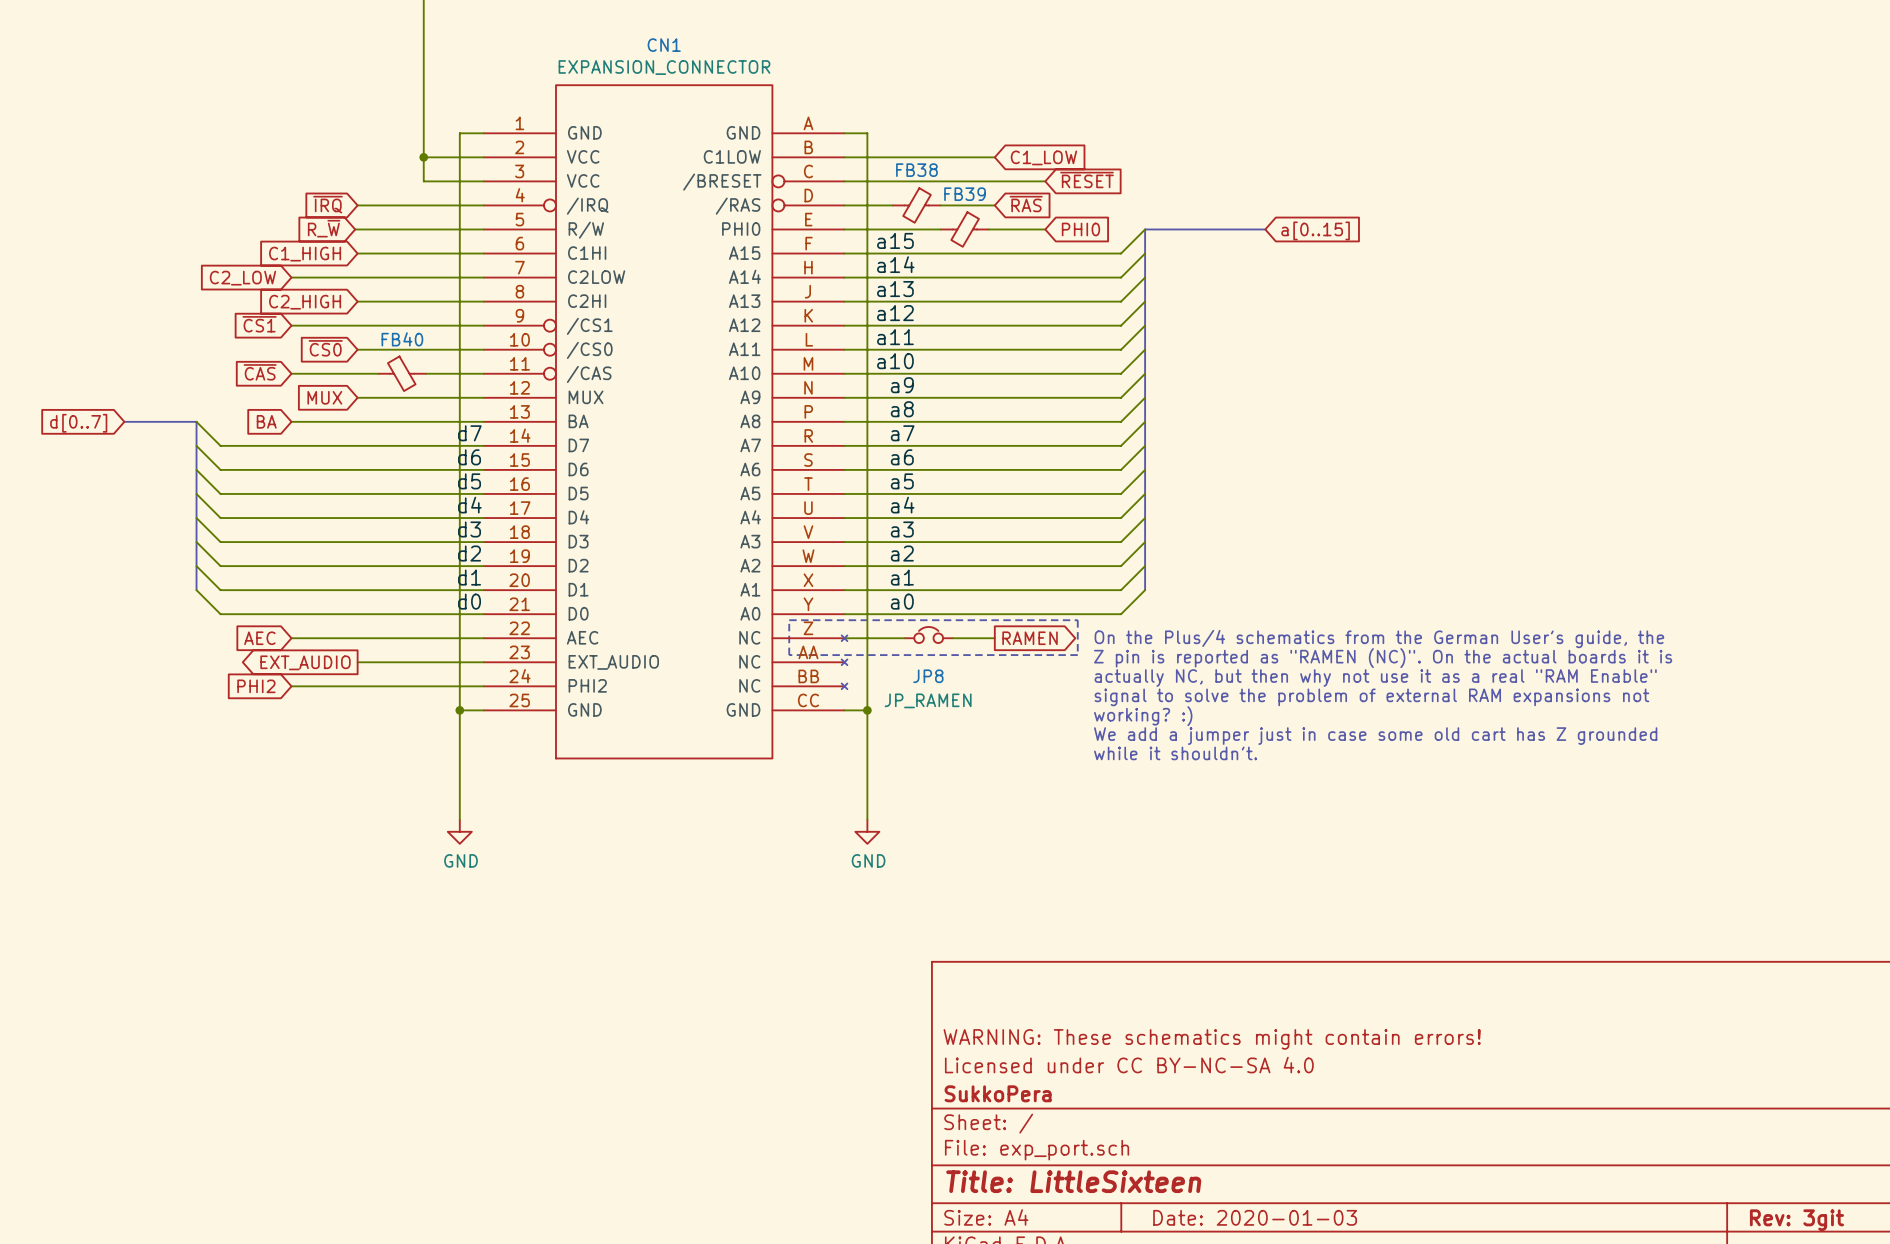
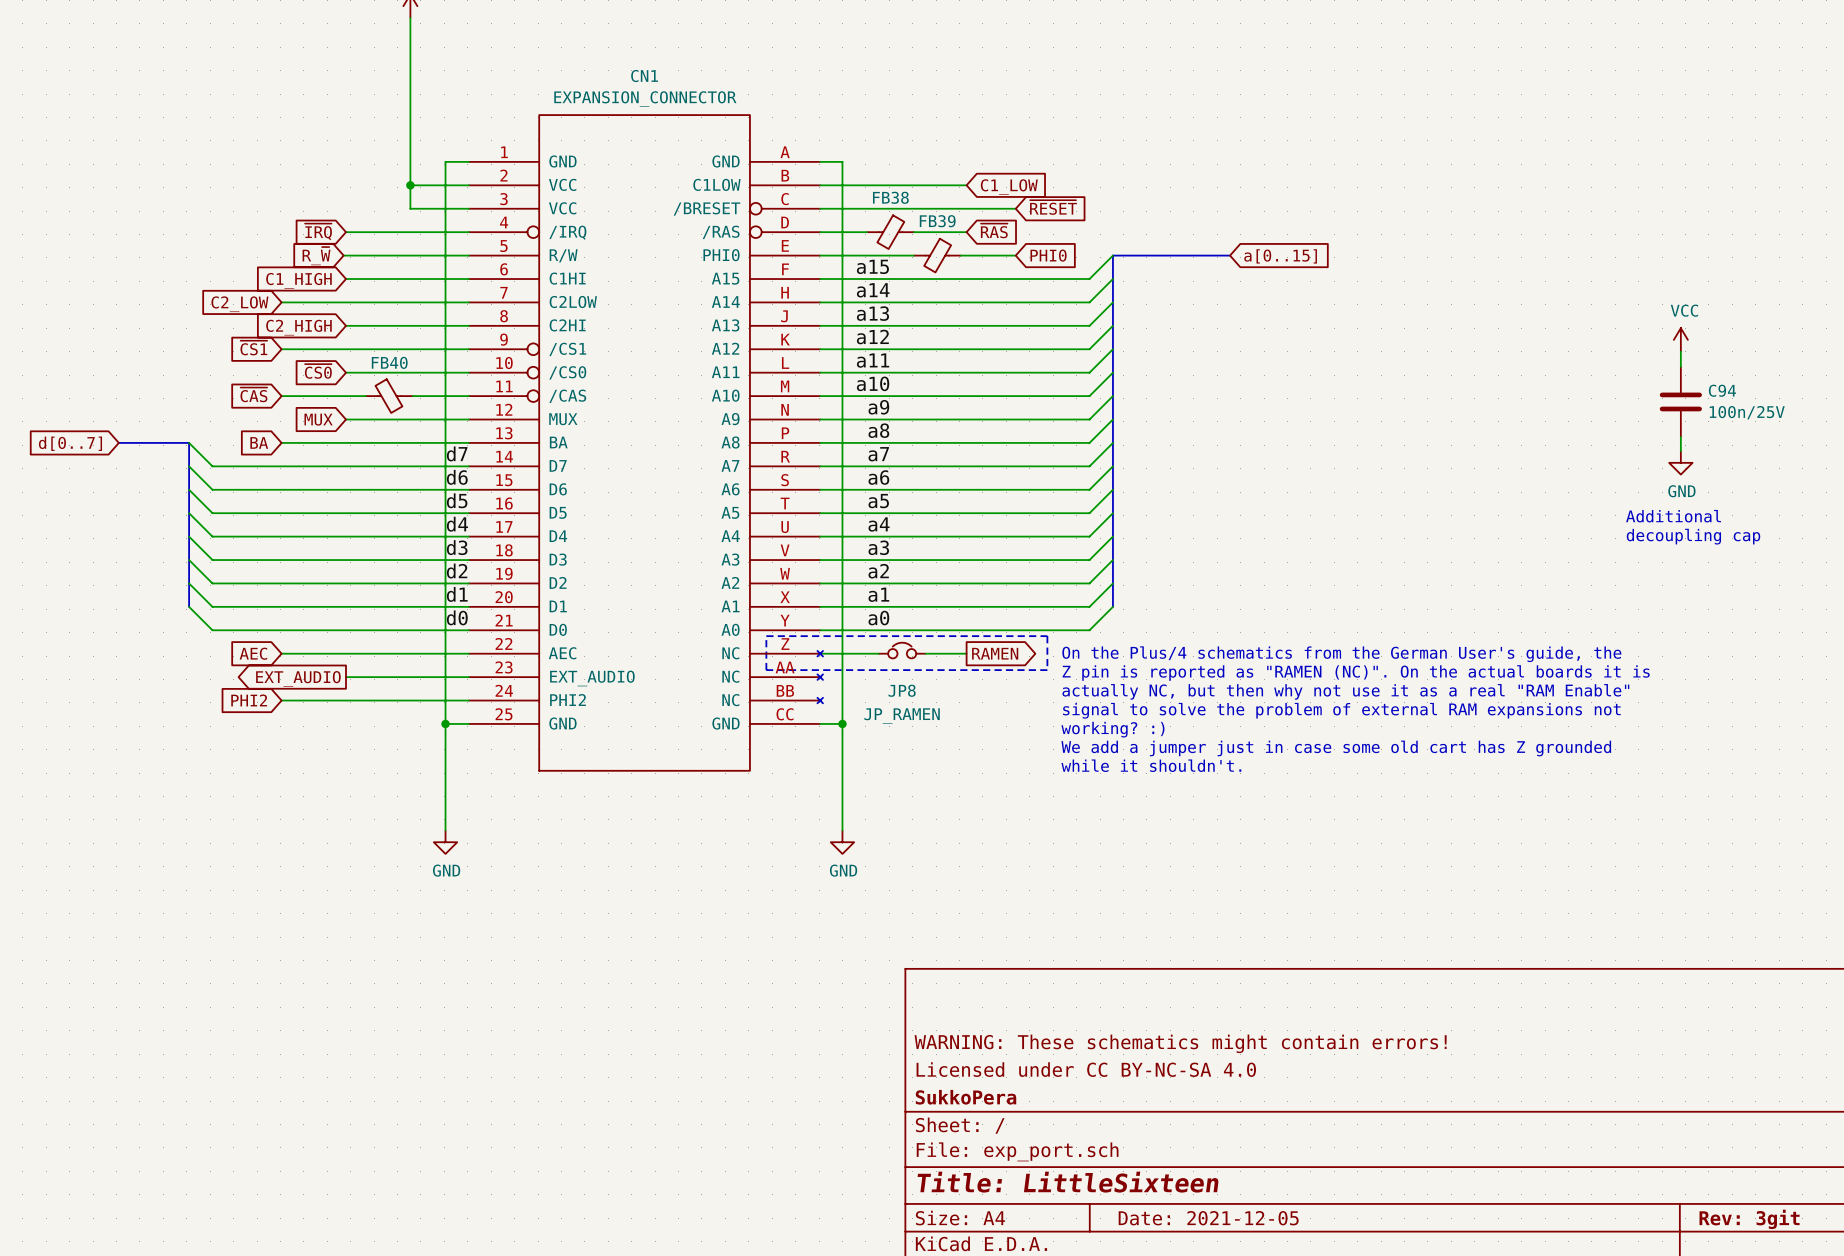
power symbol: none -> VCC (1680, 339)
wire: none -> (1680, 351) (1680, 366)
C94: none -> 100n/25V (1680, 401)
wire: none -> (1680, 437) (1680, 451)
power symbol: none -> GND (1680, 462)
text: none -> Additional (1673, 516)
text: none -> decoupling cap (1693, 536)
title block: Date: 2020-01-03 (1255, 1217) -> Date: 2021-12-05 (1208, 1218)

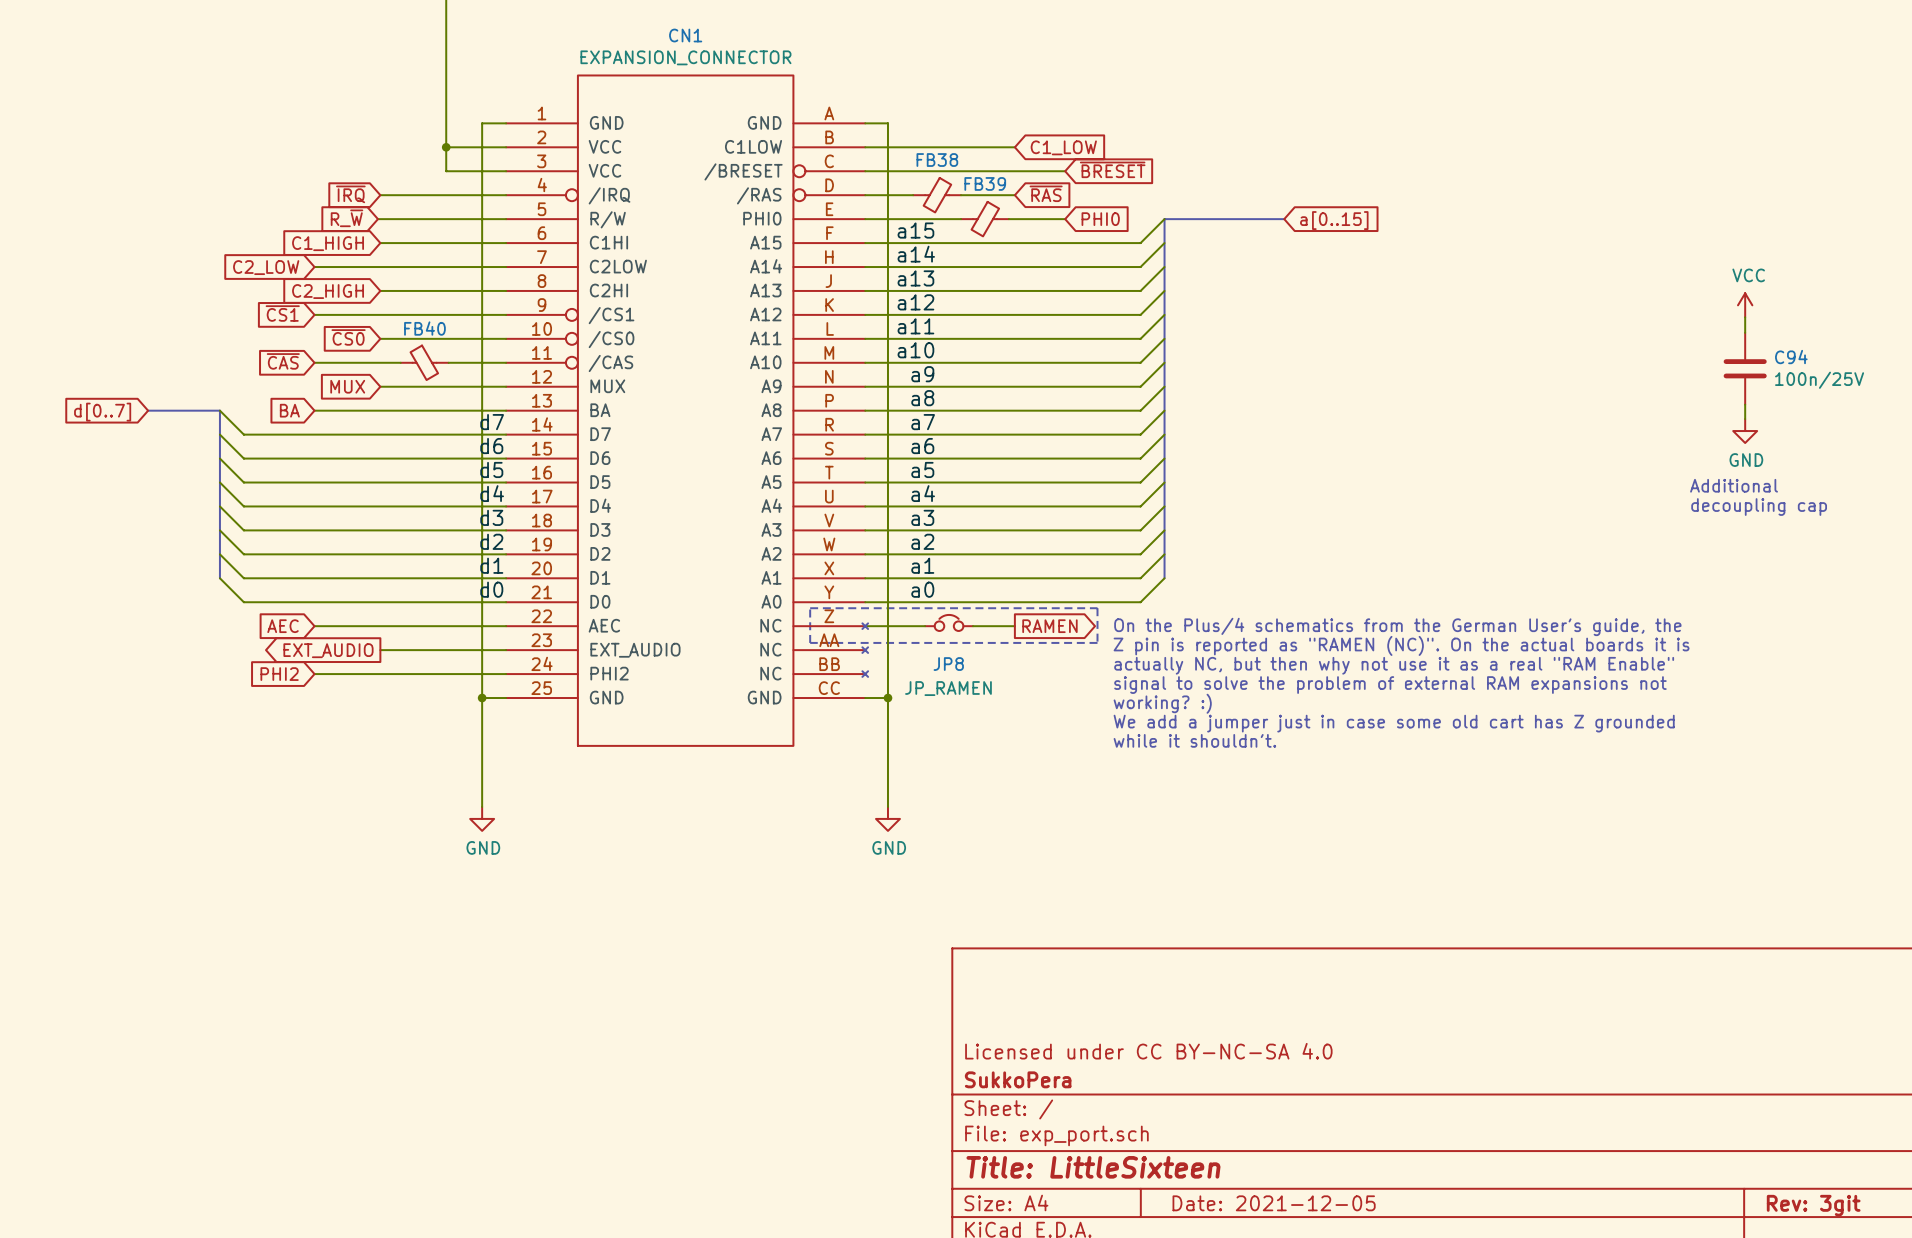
global label: ~{RESET} (1053, 207) -> ~{BRESET} (1112, 169)
title block: WARNING: These schematics might contain errors! (1180, 1043) -> none

